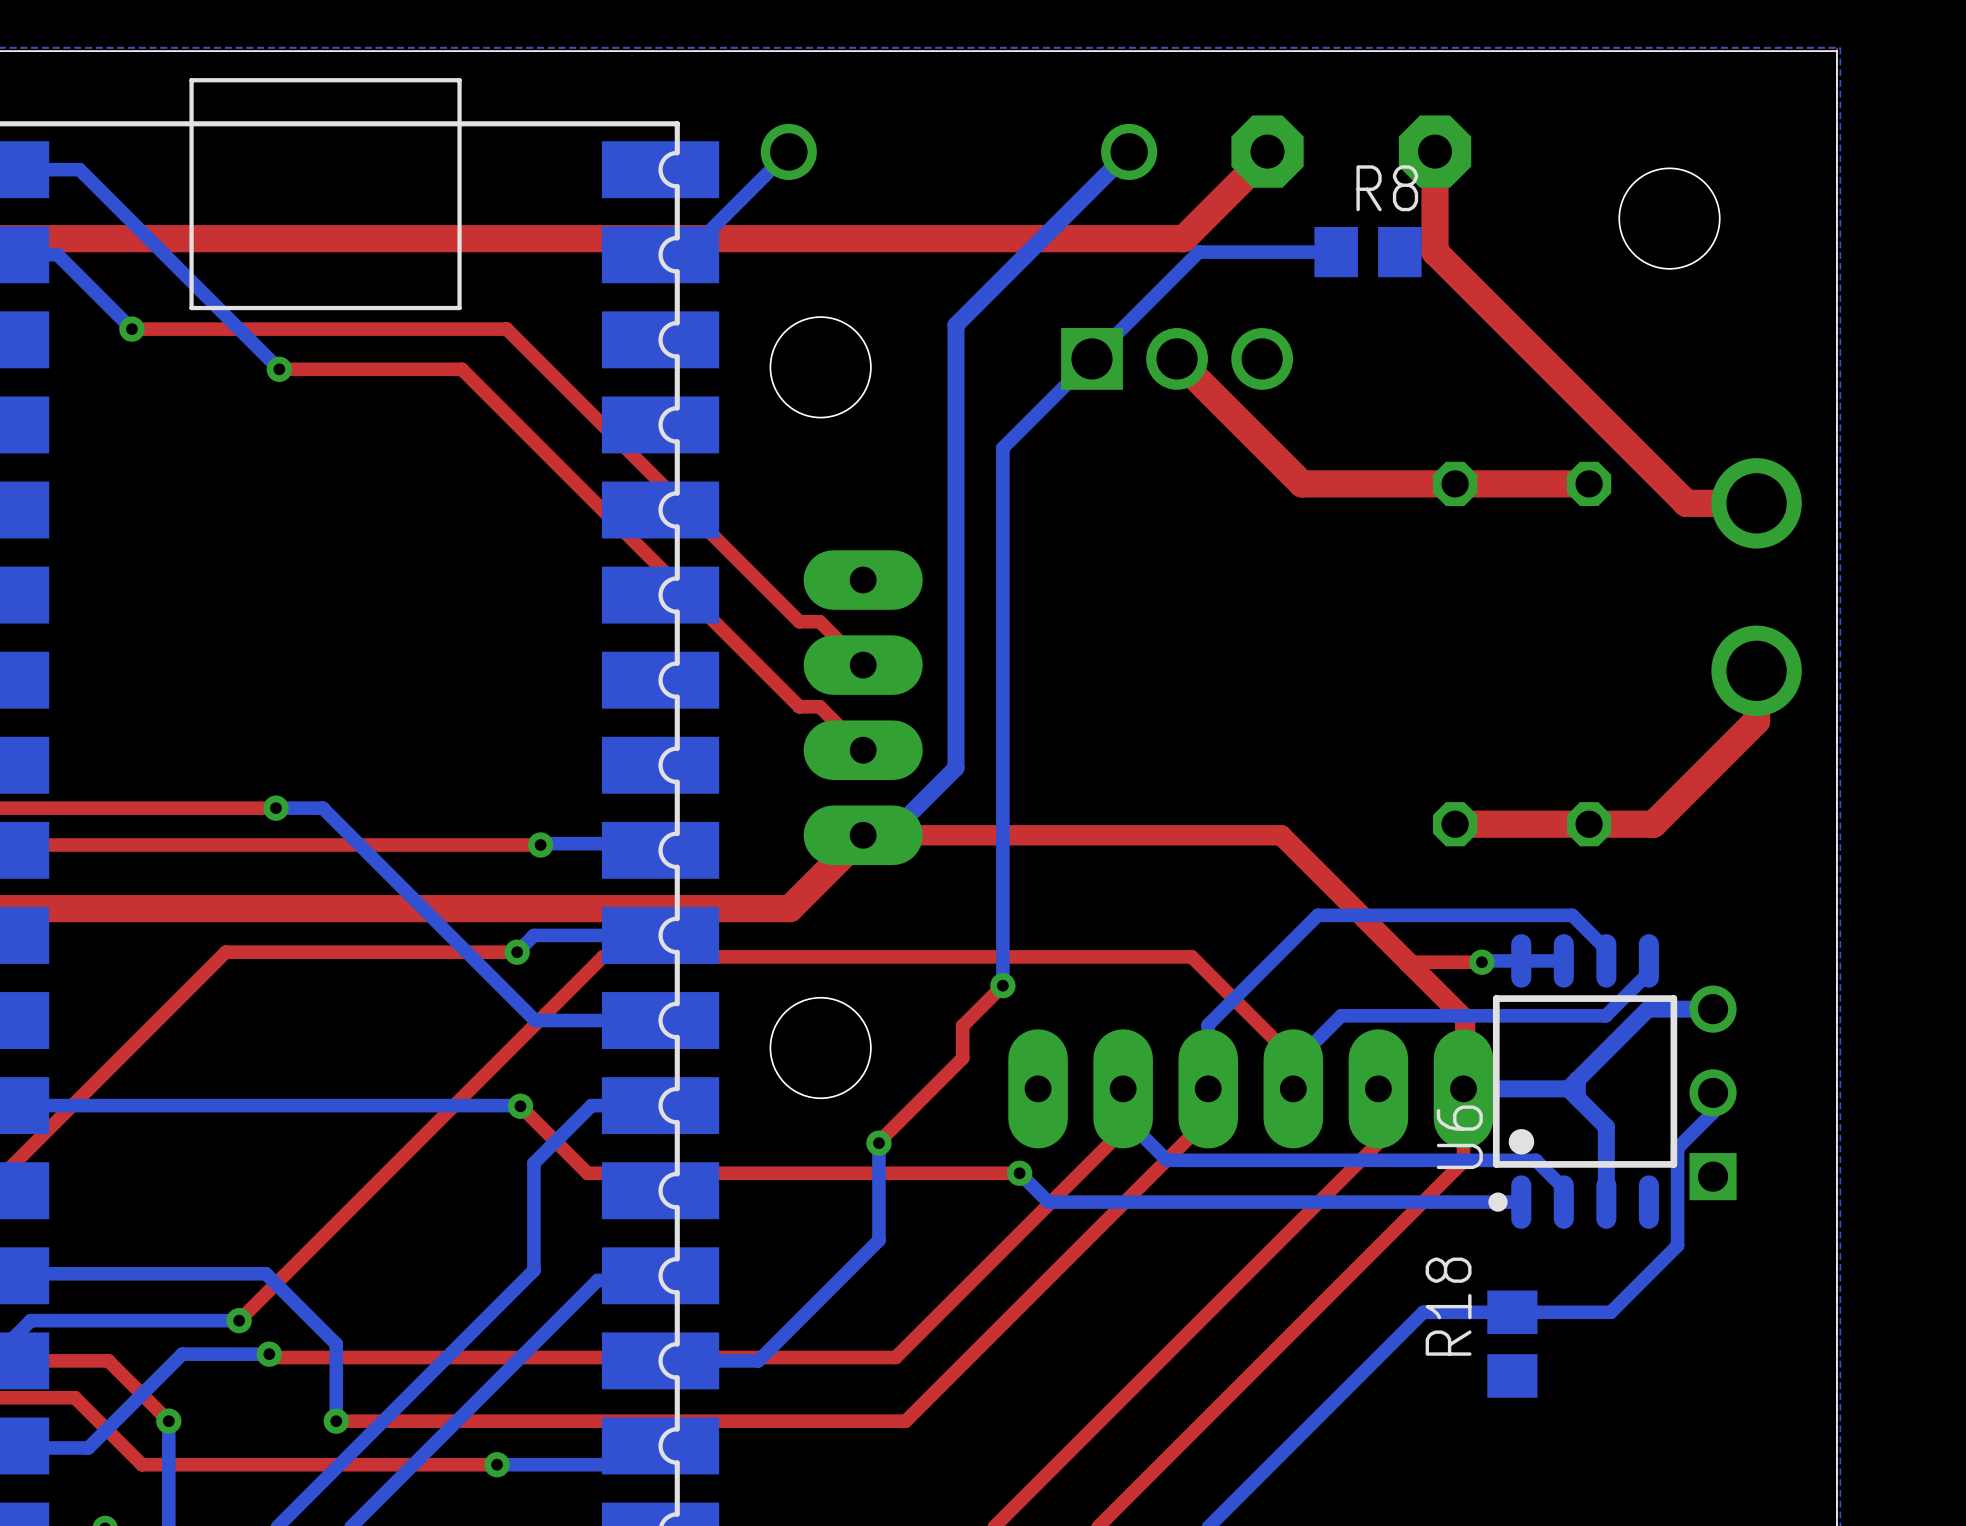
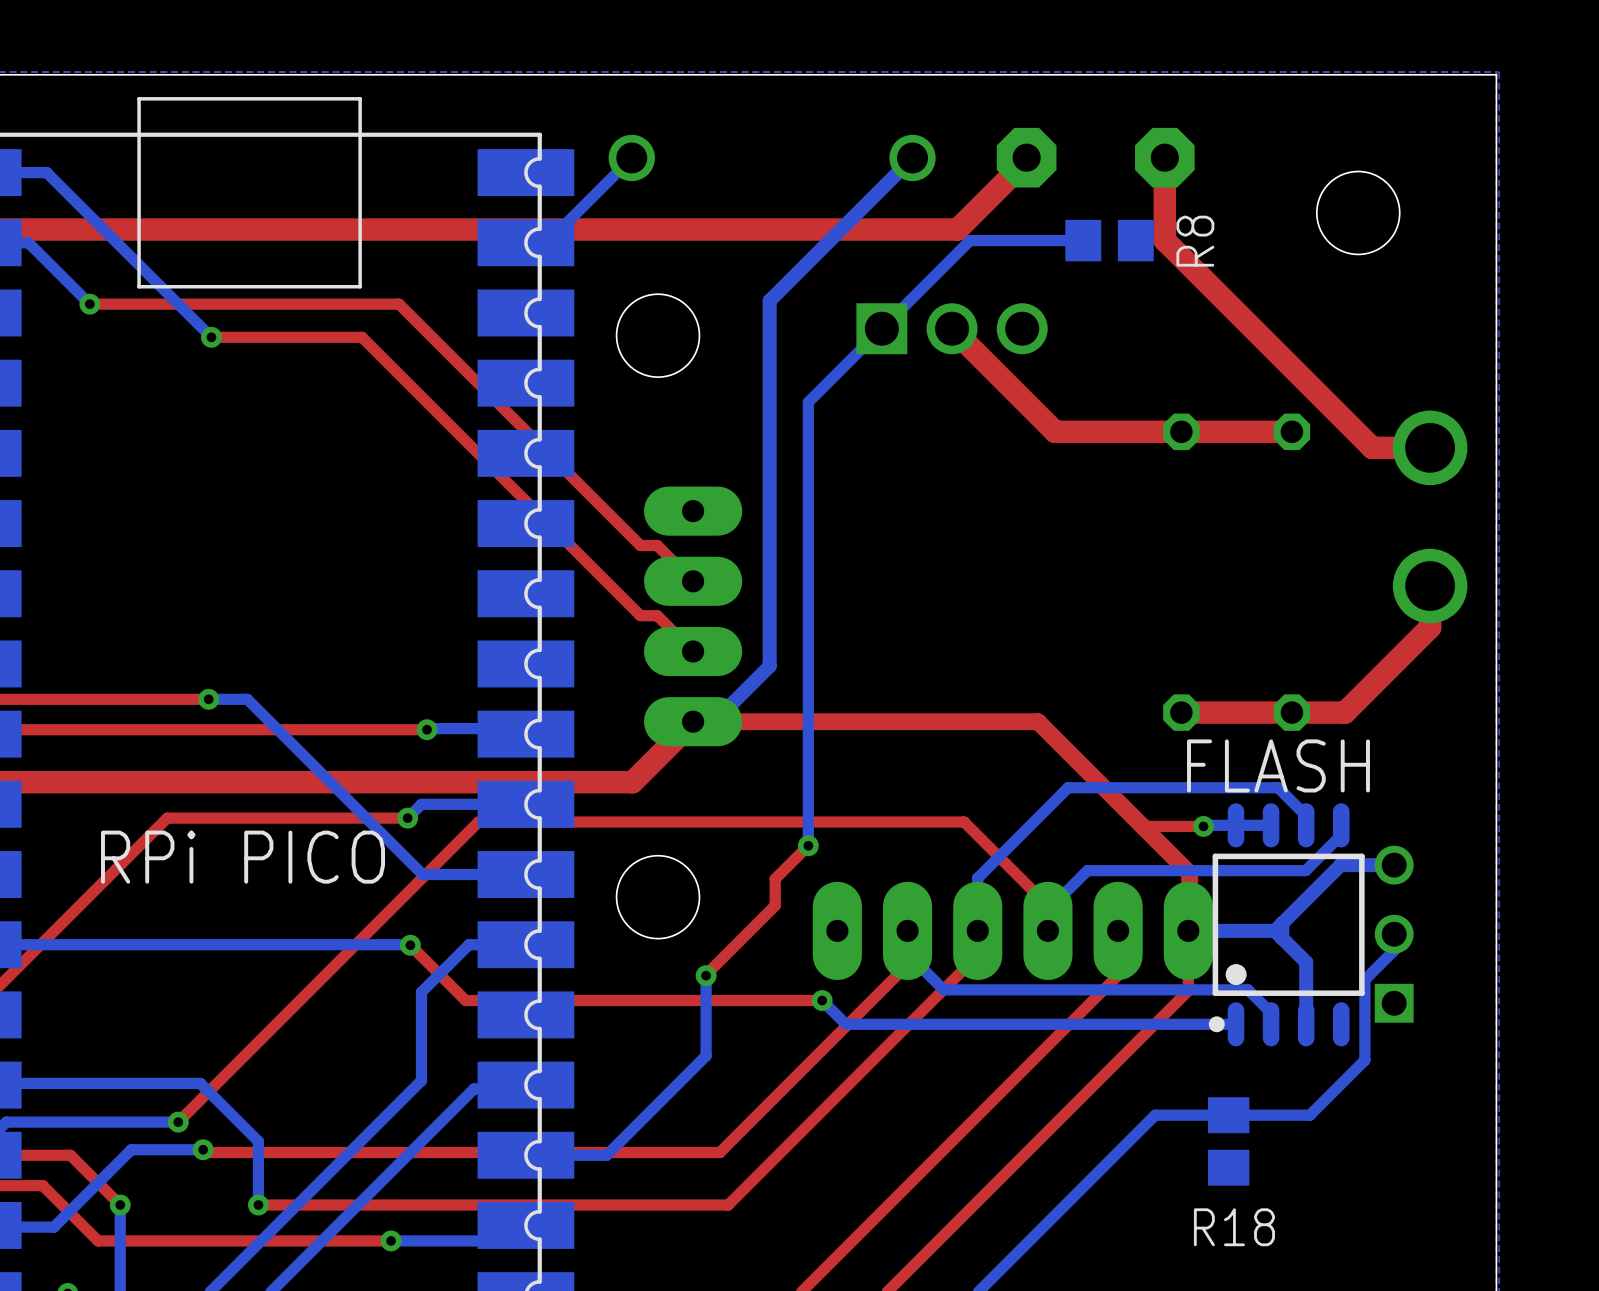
R8 name rotation: 0° (1387, 188) -> 90° counterclockwise (1195, 241)
R8 name position: R8 (1387, 188) -> R8 (1195, 241)
text: none -> FLASH (1278, 765)
text: none -> RPi PICO (243, 857)
U6 name: U6 (1459, 1137) -> none
R18 name rotation: 0° (1448, 1306) -> 90° clockwise (1234, 1227)
R18 name position: R18 (1448, 1306) -> R18 (1234, 1227)

